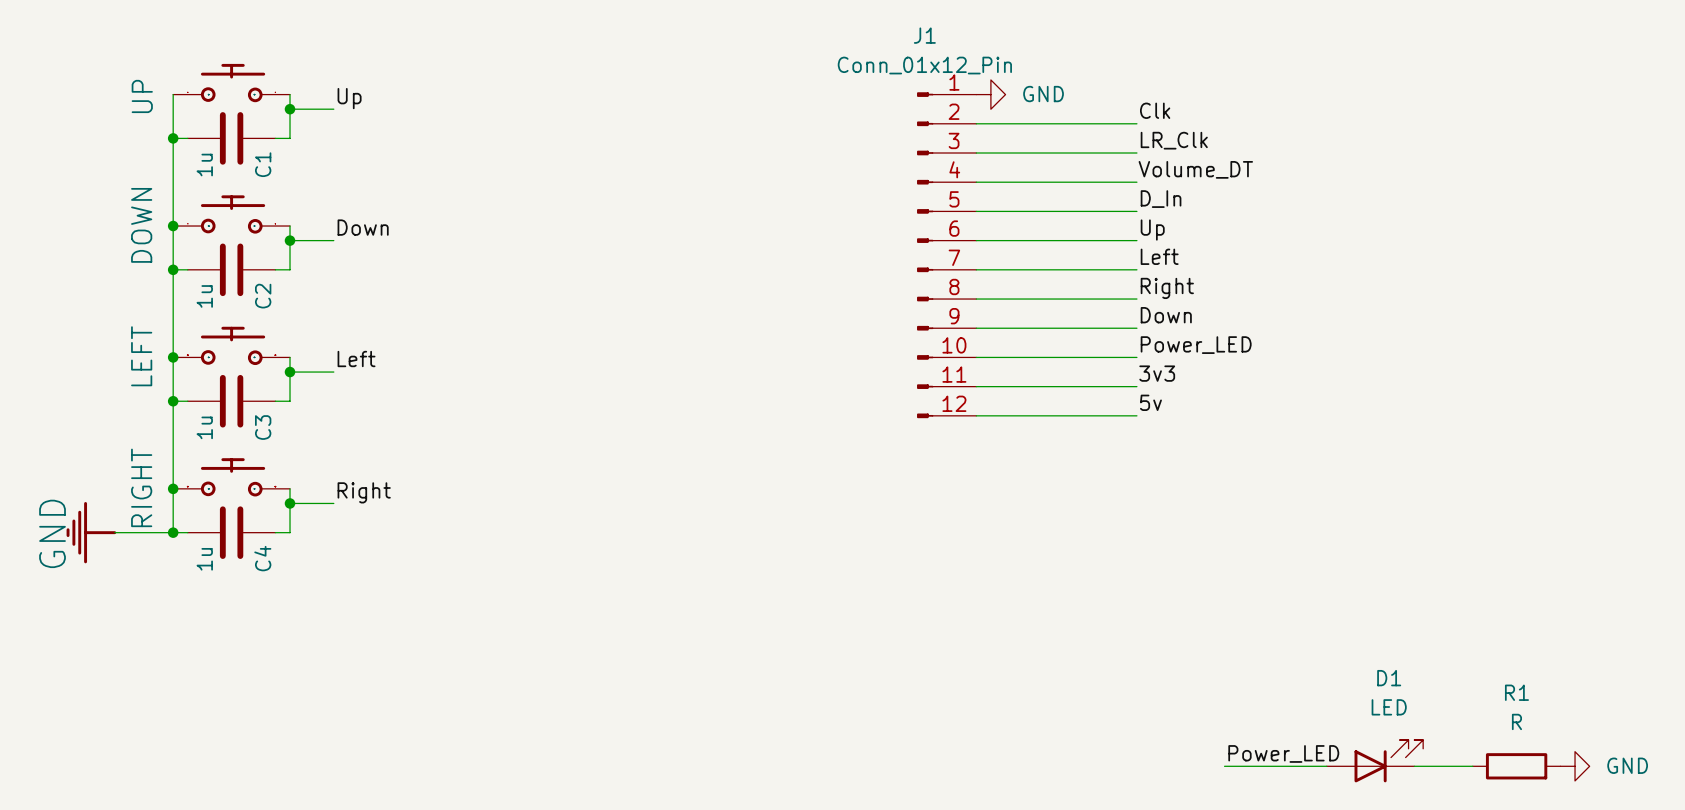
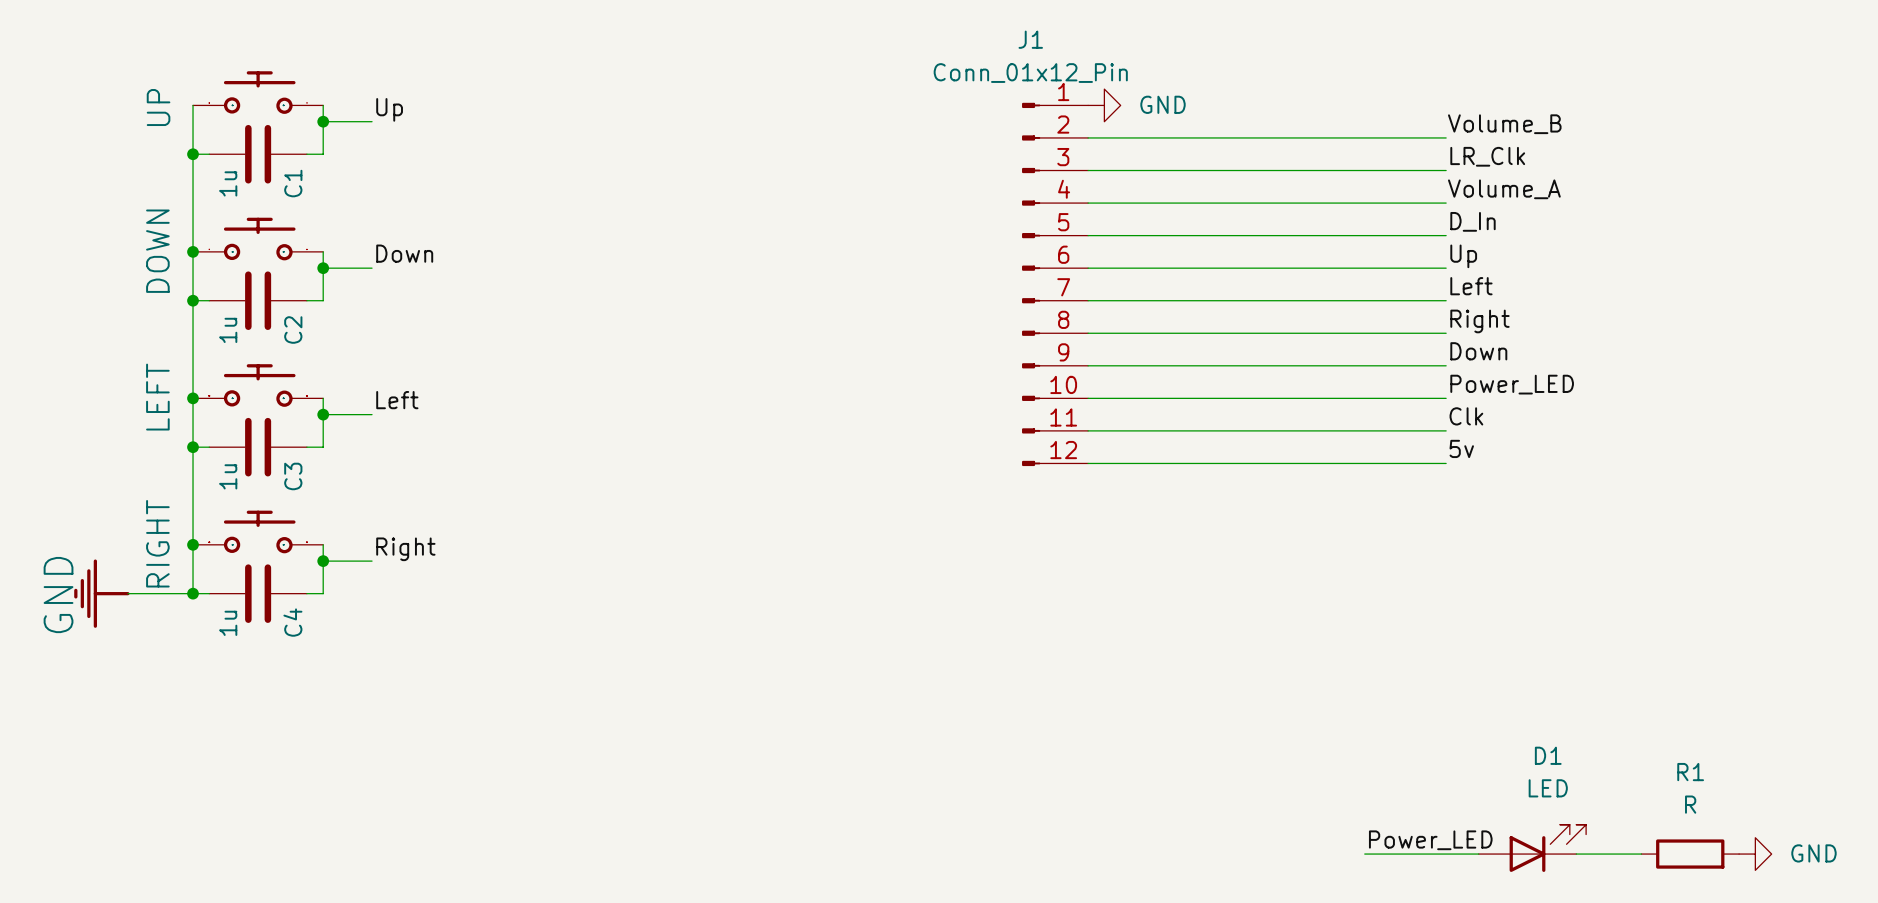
label: Clk (1155, 110) -> none
label: none -> Volume_B (1504, 124)
wire: none -> (1267, 137) (1446, 137)
label position: LR_Clk (1174, 140) -> LR_Clk (1487, 156)
wire: none -> (1267, 170) (1446, 170)
label: Volume_DT (1195, 169) -> none
label: none -> Volume_A (1504, 189)
wire: none -> (1267, 203) (1446, 203)
label position: D_In (1161, 199) -> D_In (1473, 221)
wire: none -> (1267, 235) (1446, 235)
label position: Up (1152, 230) -> Up (1463, 256)
wire: none -> (1267, 268) (1446, 268)
label position: Left (1159, 256) -> Left (1471, 286)
wire: none -> (1267, 300) (1446, 300)
label position: Right (1167, 288) -> Right (1479, 321)
wire: none -> (1267, 333) (1446, 333)
label position: Down (1166, 315) -> Down (1478, 351)
wire: none -> (1267, 365) (1446, 365)
label position: Power_LED (1196, 345) -> Power_LED (1512, 384)
wire: none -> (1267, 398) (1446, 398)
label: 3v3 (1157, 373) -> none
label: none -> Clk (1466, 416)
wire: none -> (1267, 430) (1446, 430)
label position: 5v (1150, 402) -> 5v (1461, 448)
wire: none -> (1267, 463) (1446, 463)

